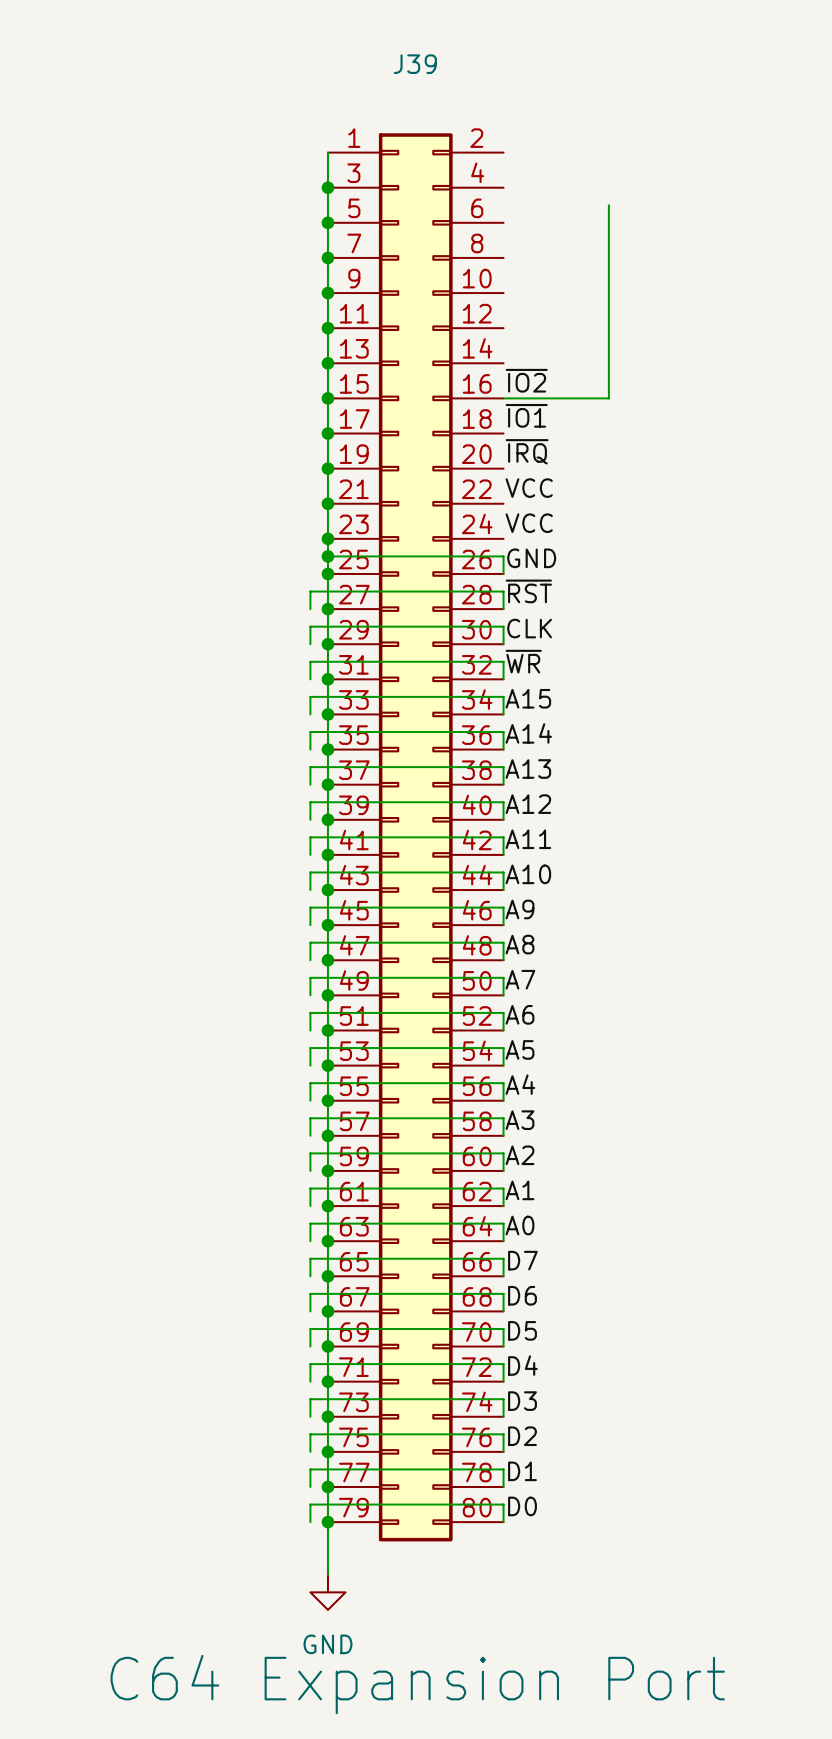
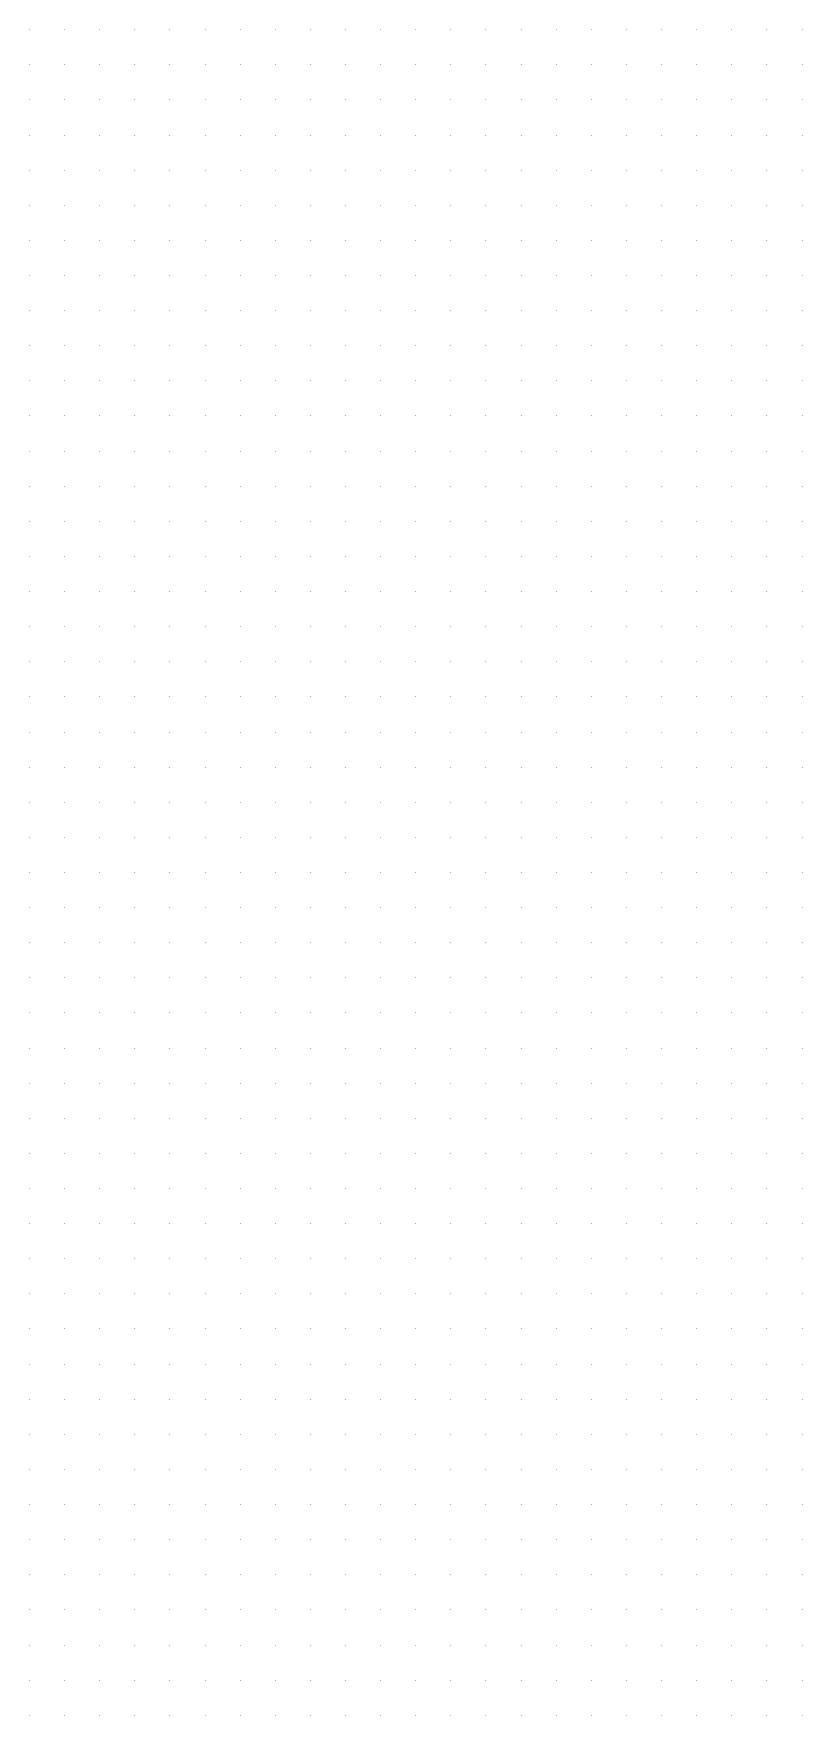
wire: (327, 152) (327, 1574) -> none
junction: (327, 187) -> none
wire: (608, 205) (608, 398) (503, 398) -> none
junction: (327, 222) -> none
junction: (327, 257) -> none
junction: (327, 293) -> none
junction: (327, 328) -> none
junction: (327, 363) -> none
label: ~{IO2} (526, 380) -> none
junction: (327, 398) -> none
label: ~{IO1} (526, 415) -> none
junction: (327, 433) -> none
label: ~{IRQ} (527, 451) -> none
junction: (327, 468) -> none
label: VCC (529, 488) -> none
junction: (327, 503) -> none
label: VCC (529, 523) -> none
junction: (327, 538) -> none
wire: (327, 556) (503, 556) (503, 573) -> none
junction: (327, 556) -> none
label: GND (531, 558) -> none
junction: (327, 573) -> none
label: ~{RST} (528, 591) -> none
wire: (310, 609) (310, 591) (503, 591) (503, 609) -> none
junction: (327, 609) -> none
label: CLK (529, 628) -> none
wire: (310, 644) (310, 626) (503, 626) (503, 644) -> none
junction: (327, 644) -> none
label: ~{WR} (523, 661) -> none
wire: (310, 679) (310, 661) (503, 661) (503, 679) -> none
junction: (327, 679) -> none
label: A15 (528, 698) -> none
wire: (310, 714) (310, 696) (503, 696) (503, 714) -> none
junction: (327, 714) -> none
label: A14 (528, 733) -> none
wire: (310, 749) (310, 732) (503, 732) (503, 749) -> none
junction: (327, 749) -> none
label: A13 (528, 769) -> none
wire: (310, 784) (310, 767) (503, 767) (503, 784) -> none
junction: (327, 784) -> none
label: A12 (528, 804) -> none
wire: (310, 819) (310, 802) (503, 802) (503, 819) -> none
junction: (327, 819) -> none
J39: C64 Expansion Port (415, 837) -> none
label: A11 (528, 839) -> none
wire: (310, 854) (310, 837) (503, 837) (503, 854) -> none
junction: (327, 854) -> none
label: A10 (528, 874) -> none
wire: (310, 890) (310, 872) (503, 872) (503, 890) -> none
junction: (327, 890) -> none
label: A9 (519, 909) -> none
wire: (310, 925) (310, 907) (503, 907) (503, 925) -> none
junction: (327, 925) -> none
label: A8 (519, 944) -> none
wire: (310, 960) (310, 942) (503, 942) (503, 960) -> none
junction: (327, 960) -> none
label: A7 (520, 979) -> none
wire: (310, 995) (310, 977) (503, 977) (503, 995) -> none
junction: (327, 995) -> none
label: A6 (519, 1014) -> none
wire: (310, 1030) (310, 1012) (503, 1012) (503, 1030) -> none
junction: (327, 1030) -> none
label: A5 (519, 1049) -> none
wire: (310, 1065) (310, 1048) (503, 1048) (503, 1065) -> none
junction: (327, 1065) -> none
label: A4 (520, 1084) -> none
wire: (310, 1100) (310, 1083) (503, 1083) (503, 1100) -> none
junction: (327, 1100) -> none
label: A3 (519, 1120) -> none
wire: (310, 1135) (310, 1118) (503, 1118) (503, 1135) -> none
junction: (327, 1135) -> none
label: A2 (519, 1155) -> none
wire: (310, 1170) (310, 1153) (503, 1153) (503, 1170) -> none
junction: (327, 1170) -> none
label: A1 (519, 1190) -> none
wire: (310, 1206) (310, 1188) (503, 1188) (503, 1206) -> none
junction: (327, 1206) -> none
label: A0 (519, 1225) -> none
wire: (310, 1241) (310, 1223) (503, 1223) (503, 1241) -> none
junction: (327, 1241) -> none
label: D7 (522, 1260) -> none
wire: (310, 1276) (310, 1258) (503, 1258) (503, 1276) -> none
junction: (327, 1276) -> none
label: D6 (522, 1295) -> none
wire: (310, 1311) (310, 1293) (503, 1293) (503, 1311) -> none
junction: (327, 1311) -> none
label: D5 (522, 1330) -> none
wire: (310, 1346) (310, 1328) (503, 1328) (503, 1346) -> none
junction: (327, 1346) -> none
label: D4 (522, 1365) -> none
wire: (310, 1381) (310, 1364) (503, 1364) (503, 1381) -> none
junction: (327, 1381) -> none
label: D3 (522, 1401) -> none
wire: (310, 1416) (310, 1399) (503, 1399) (503, 1416) -> none
junction: (327, 1416) -> none
label: D2 (522, 1436) -> none
wire: (310, 1451) (310, 1434) (503, 1434) (503, 1451) -> none
junction: (327, 1451) -> none
label: D1 (522, 1471) -> none
wire: (310, 1487) (310, 1469) (503, 1469) (503, 1487) -> none
junction: (327, 1487) -> none
label: D0 (522, 1506) -> none
wire: (310, 1522) (310, 1504) (503, 1504) (503, 1522) -> none
junction: (327, 1522) -> none
power symbol: GND (327, 1592) -> none

